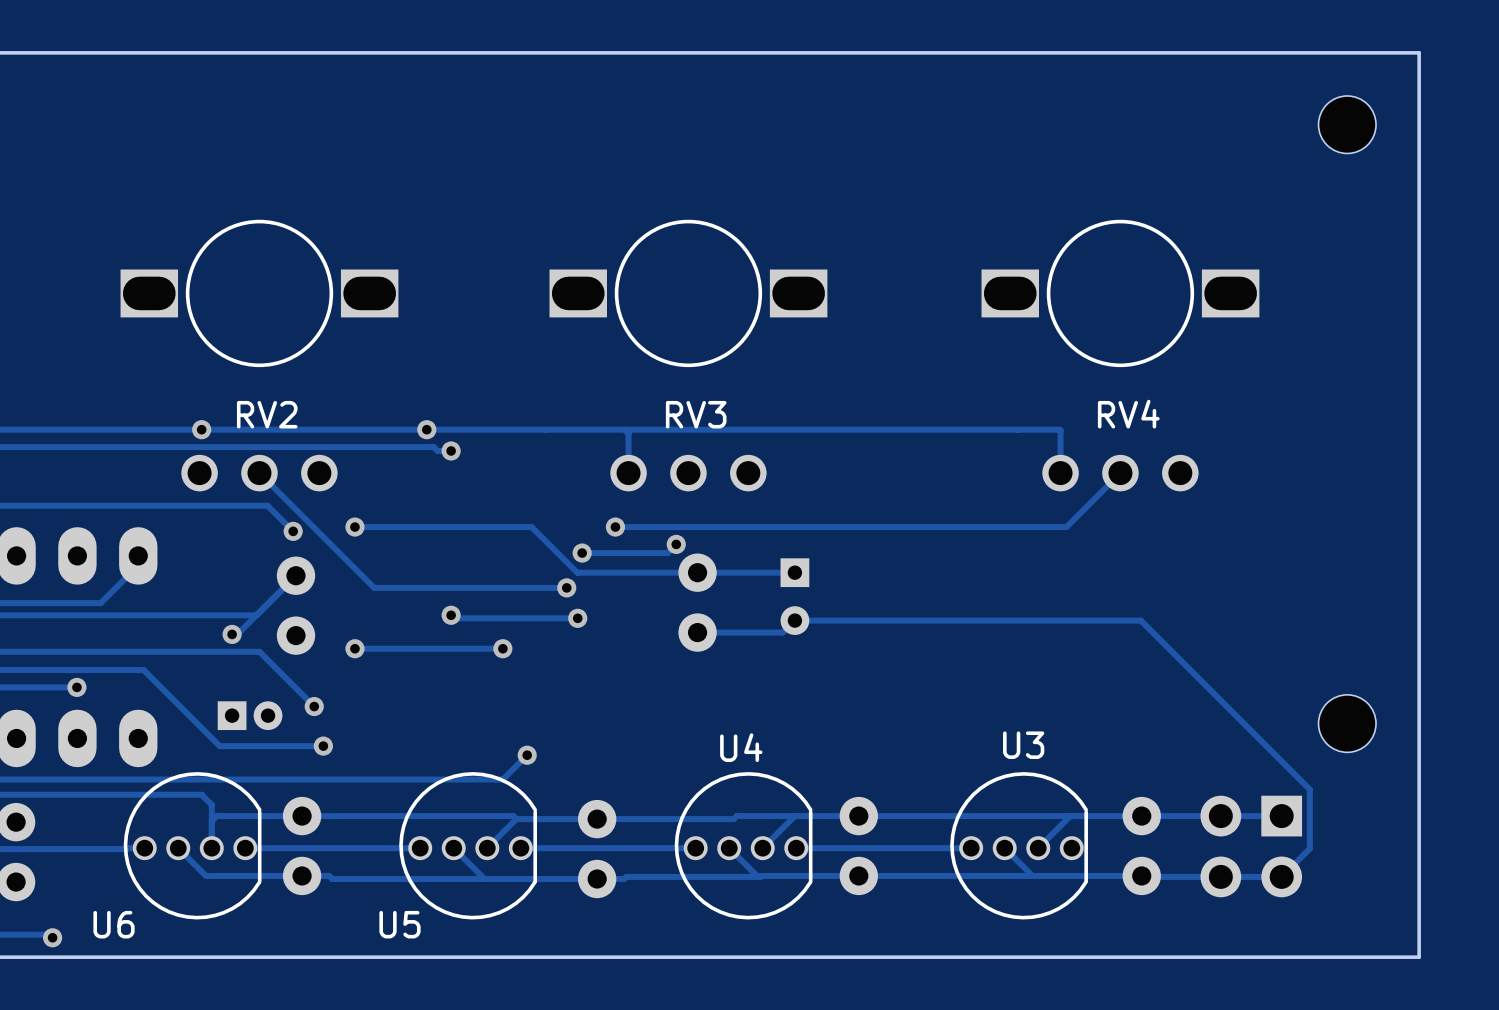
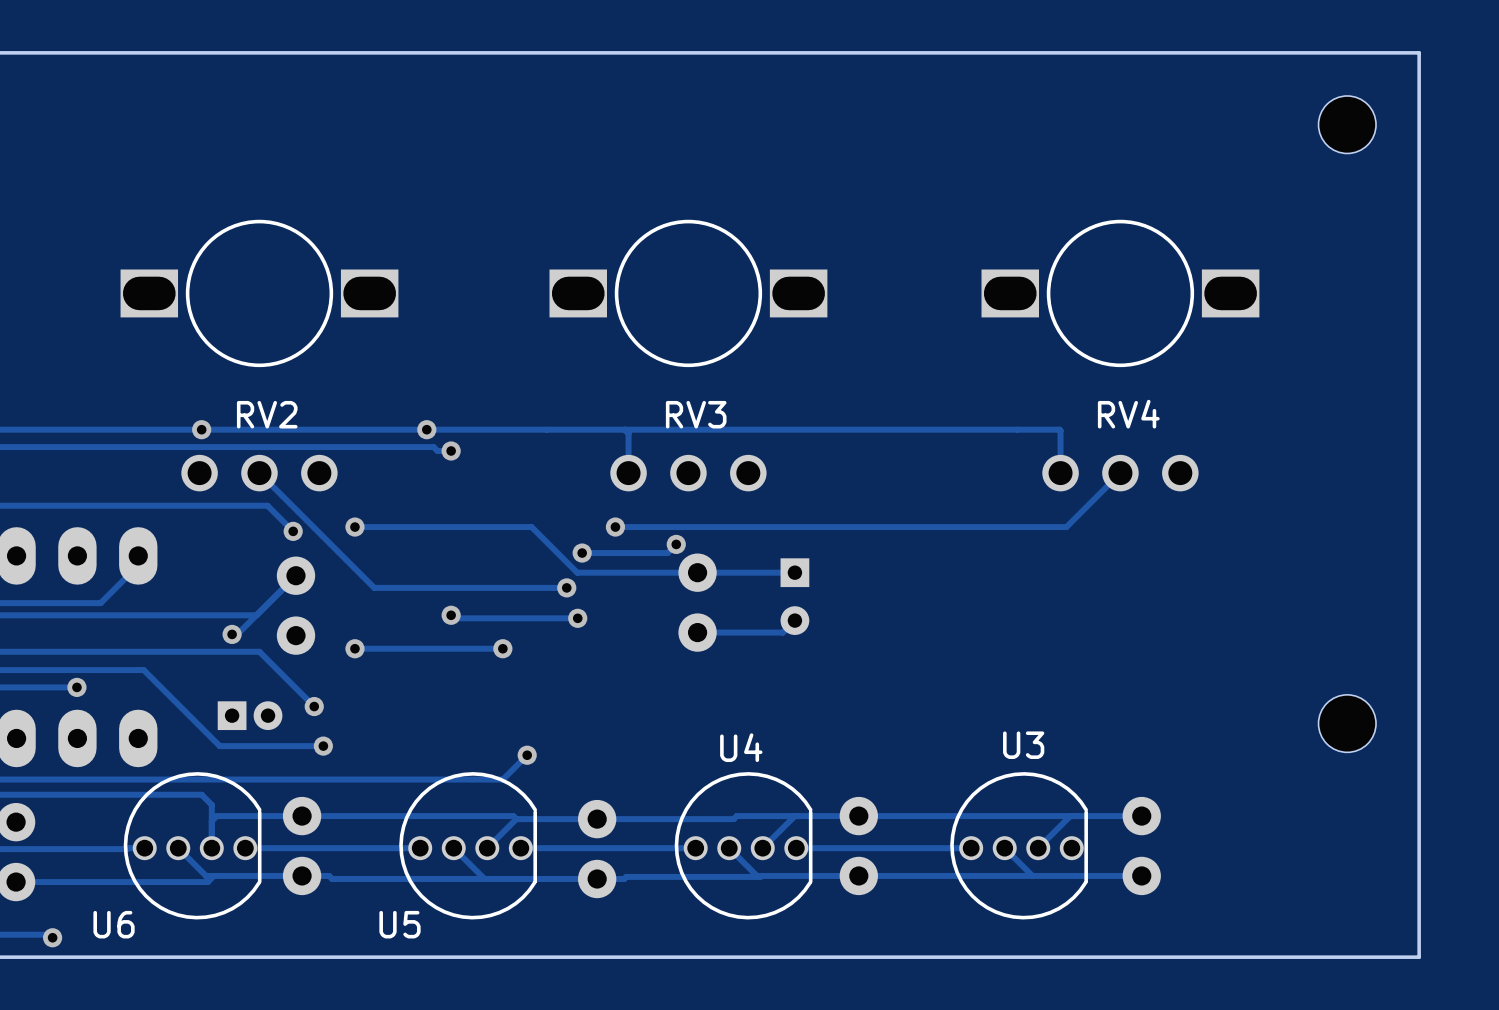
track: (794, 620) (1140, 620) (1309, 789) (1309, 848) (1281, 876) (1141, 875) -> none
track: (1141, 816) (1281, 816) -> none
part: (1251, 846) -> none
track: none -> (213, 875) (207, 882) (16, 882)

